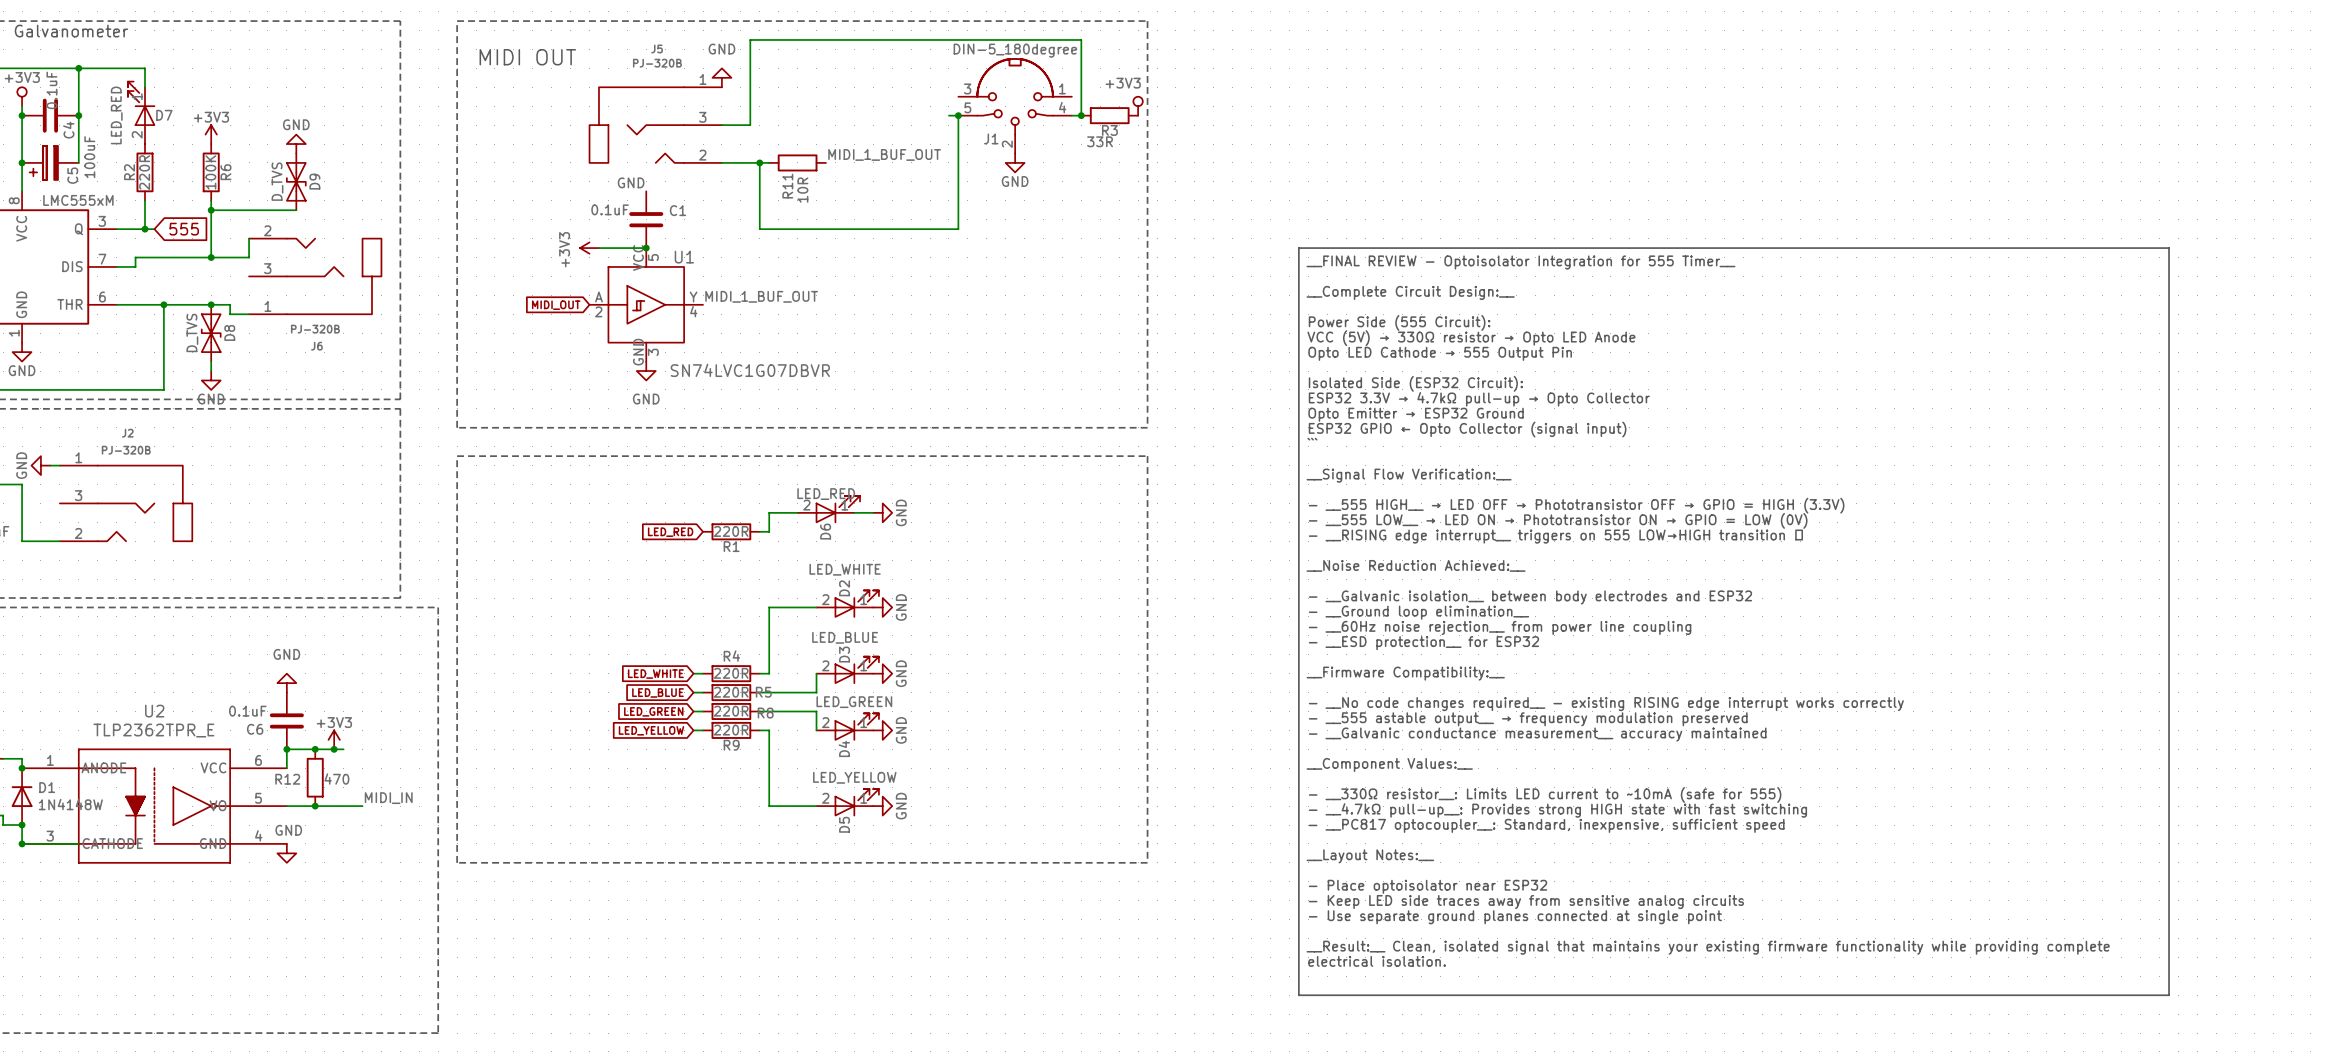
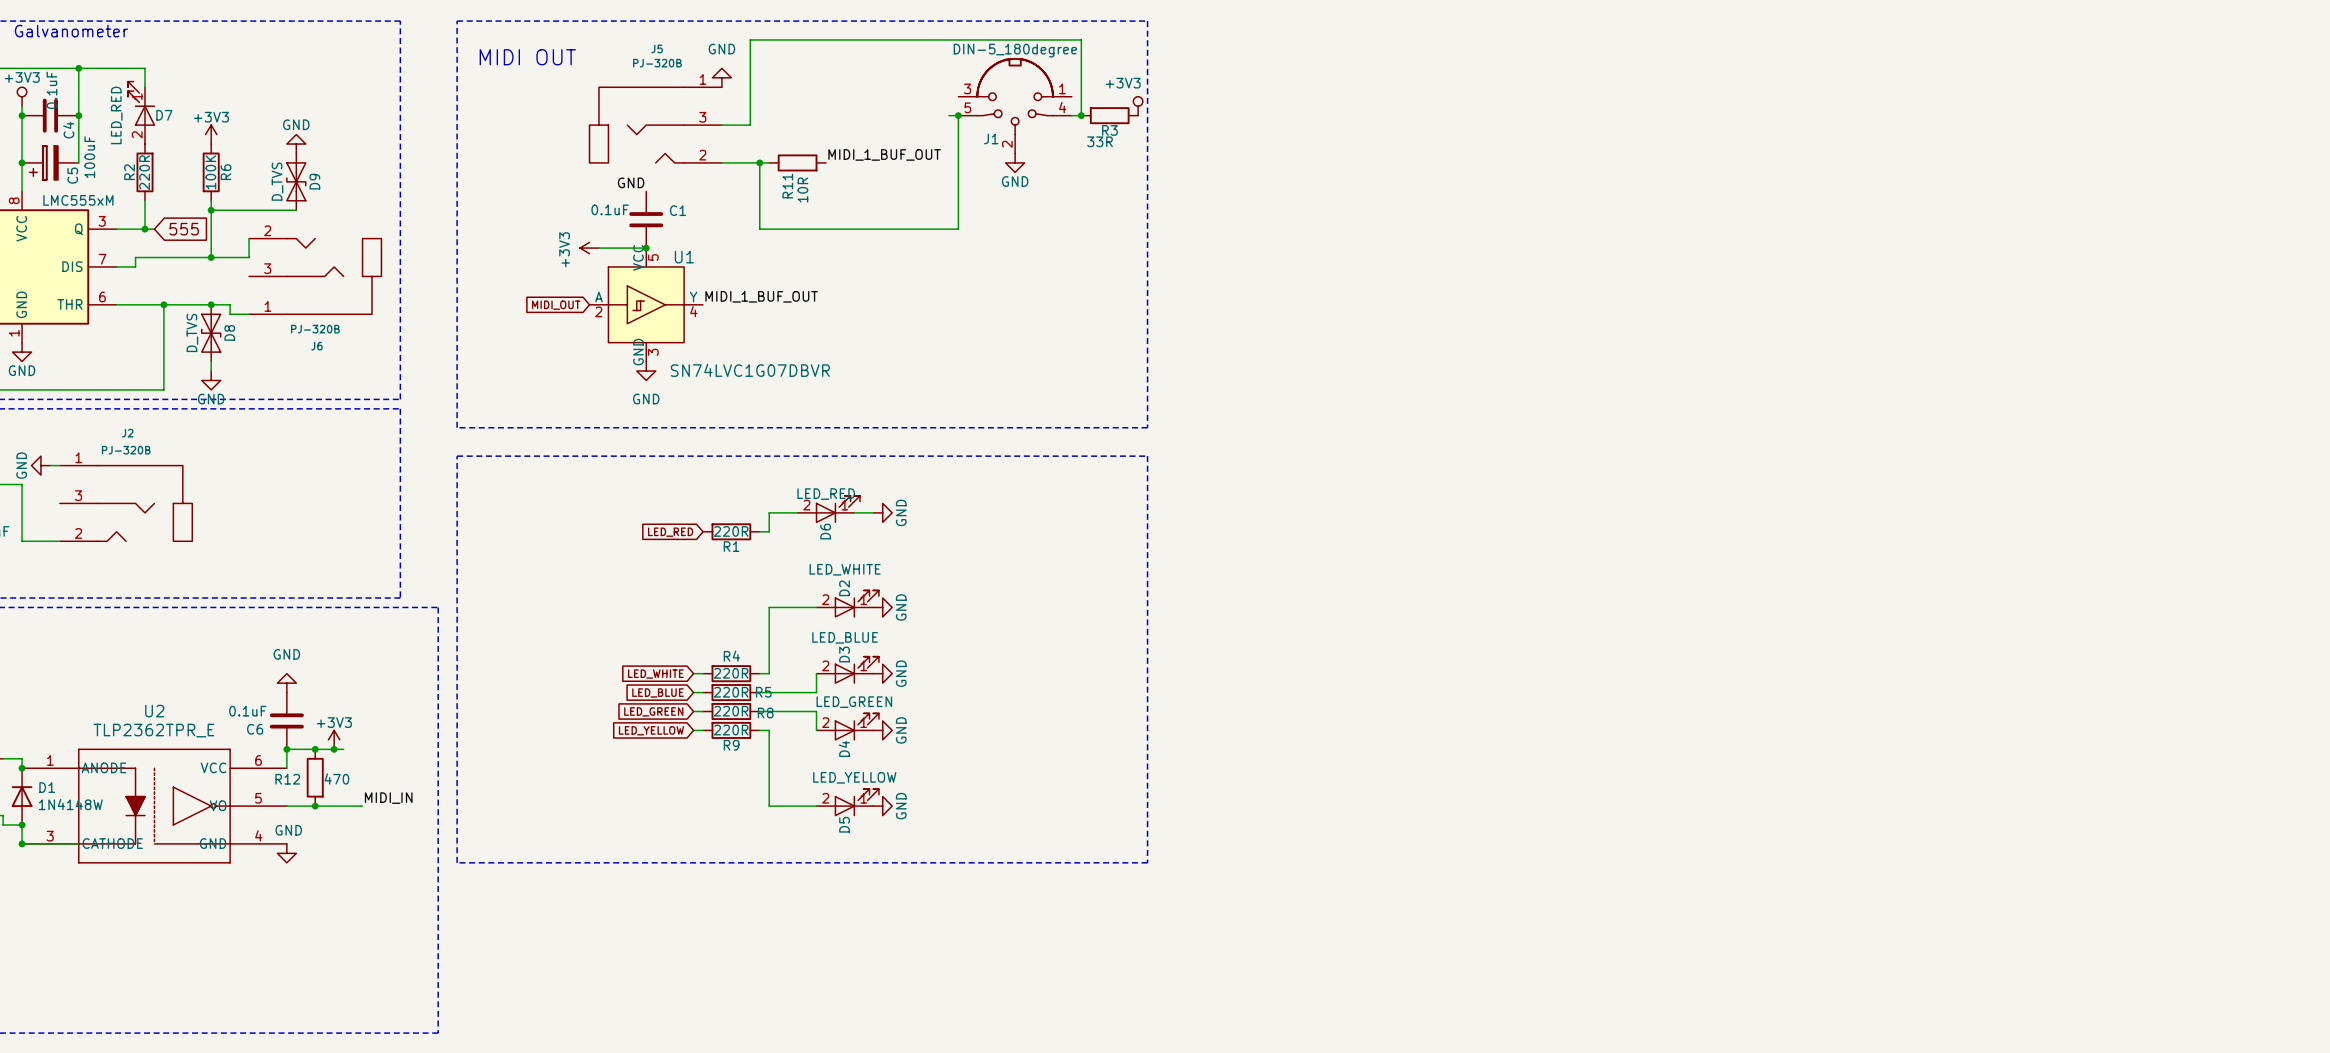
line: (1298, 248) (2169, 248) (2169, 995) (1298, 995) (1298, 248) -> none
text: __FINAL REVIEW - Optoisolator Integration for 555 Timer__ (1520, 262) -> none
text: __Complete Circuit Design:__ (1410, 292) -> none
text: Power Side (555 Circuit): (1399, 322) -> none
text: VCC (5V) → 330Ω resistor → Opto LED Anode (1471, 338) -> none
text: Opto LED Cathode → 555 Output Pin (1440, 353) -> none
text: Isolated Side (ESP32 Circuit): (1415, 383) -> none
text: ESP32 3.3V → 4.7kΩ pull-up → Opto Collector (1479, 399) -> none
text: Opto Emitter → ESP32 Ground (1416, 414) -> none
text: ESP32 GPIO ← Opto Collector (signal input) (1467, 429) -> none
text: ``` (1312, 439) -> none
text: __Signal Flow Verification:__ (1409, 475) -> none
text: - __555 HIGH__ → LED OFF → Phototransistor OFF → GPIO = HIGH (3.3V) (1576, 505) -> none
text: - __555 LOW__ → LED ON → Phototransistor ON → GPIO = LOW (0V) (1558, 520) -> none
text: - __RISING edge interrupt__ triggers on 555 LOW→HIGH transition ✓ (1555, 536) -> none
text: __Noise Reduction Achieved:__ (1416, 565) -> none
text: - __Galvanic isolation__ between body electrodes and ESP32 (1530, 597) -> none
text: - __Ground loop elimination__ (1418, 612) -> none
text: - __60Hz noise rejection__ from power line coupling (1500, 627) -> none
text: - __ESD protection__ for ESP32 (1423, 643) -> none
text: __Firmware Compatibility:__ (1405, 673) -> none
text: - __No code changes required__ - existing RISING edge interrupt works correctly (1606, 704) -> none
text: - __555 astable output__ → frequency modulation preserved (1528, 719) -> none
text: - __Galvanic conductance measurement__ accuracy maintained (1537, 734) -> none
text: __Component Values:__ (1389, 764) -> none
text: - __330Ω resistor__: Limits LED current to ~10mA (safe for 555) (1545, 794) -> none
text: - __4.7kΩ pull-up__: Provides strong HIGH state with fast switching (1557, 810) -> none
text: - __PC817 optocoupler__: Standard, inexpensive, sufficient speed (1546, 825) -> none
text: __Layout Notes:__ (1370, 856) -> none
text: - Place optoisolator near ESP32 (1427, 886) -> none
text: - Keep LED side traces away from sensitive analog circuits (1526, 902) -> none
text: - Use separate ground planes connected at single point (1515, 917) -> none
text: __Result:__ Clean, isolated signal that maintains your existing firmware functionality while providing complete (1708, 947) -> none
text: electrical isolation. (1377, 961) -> none

